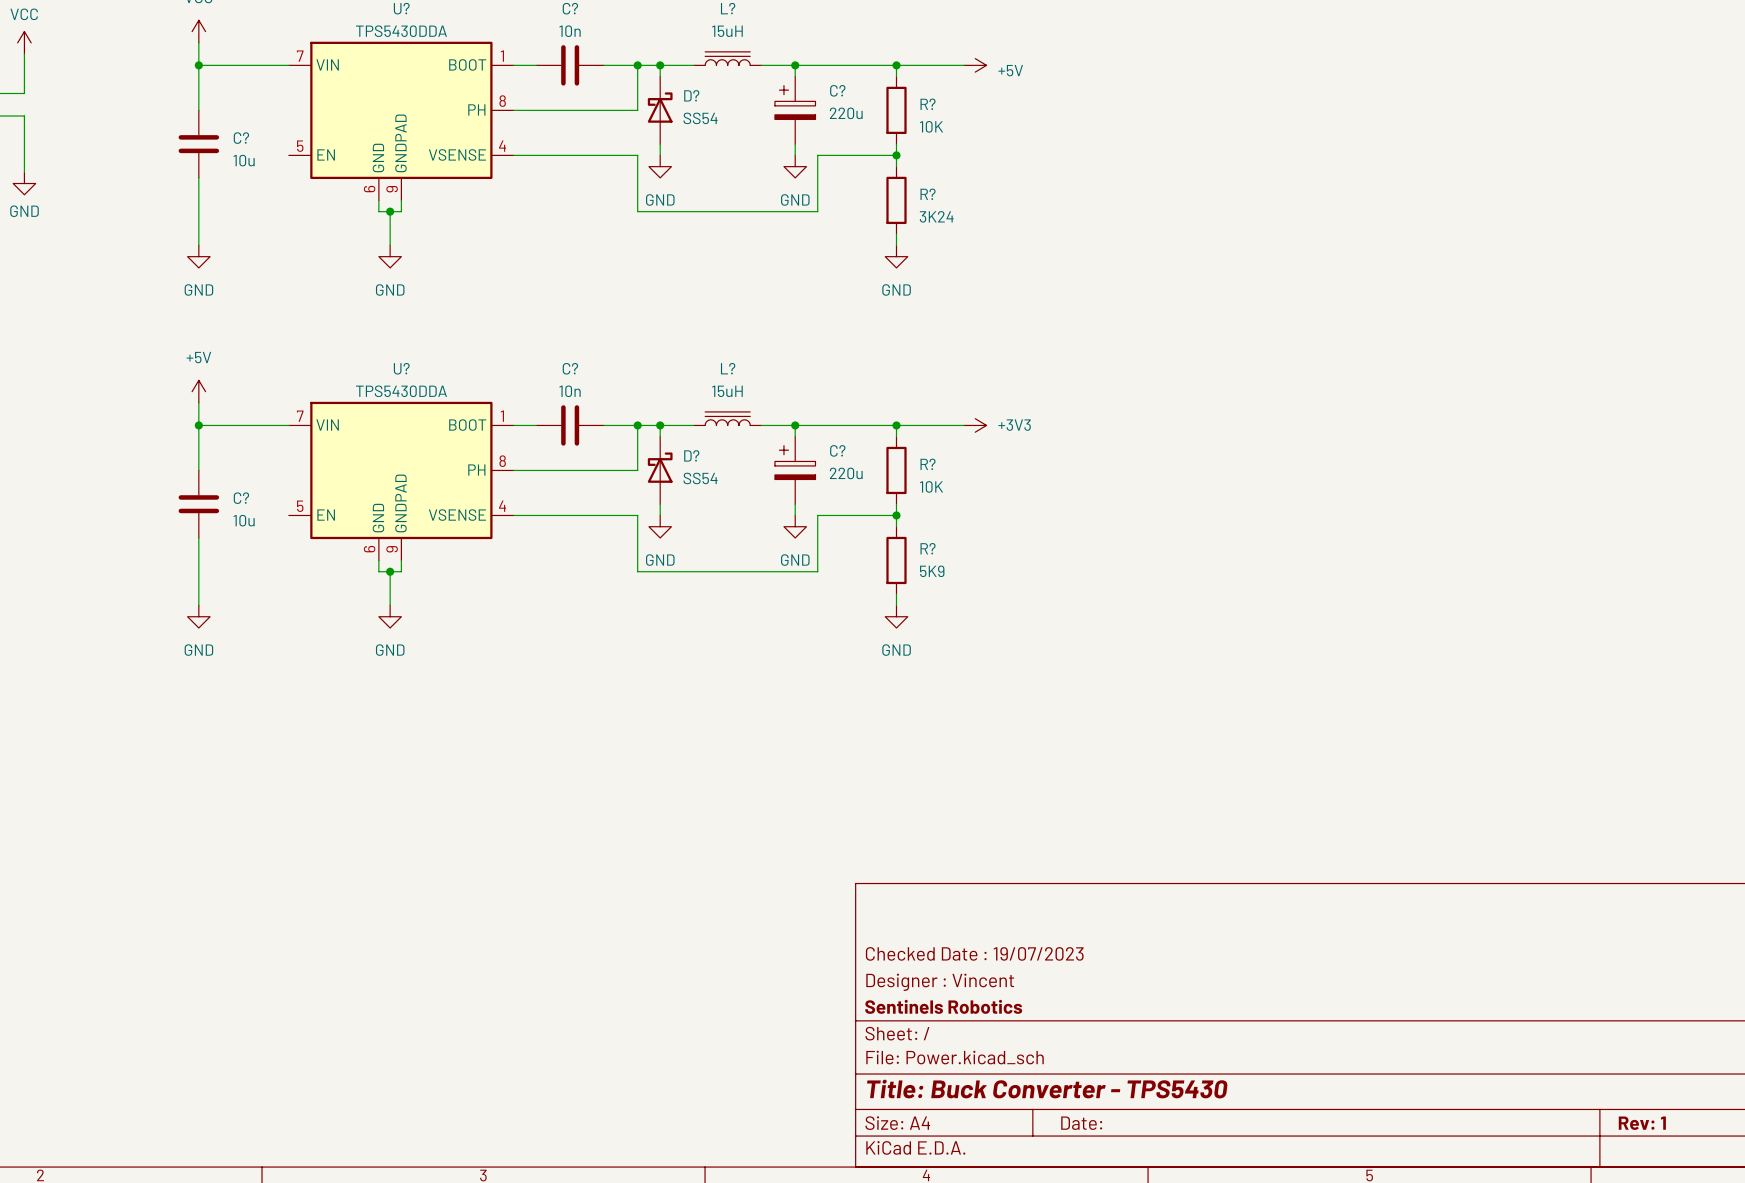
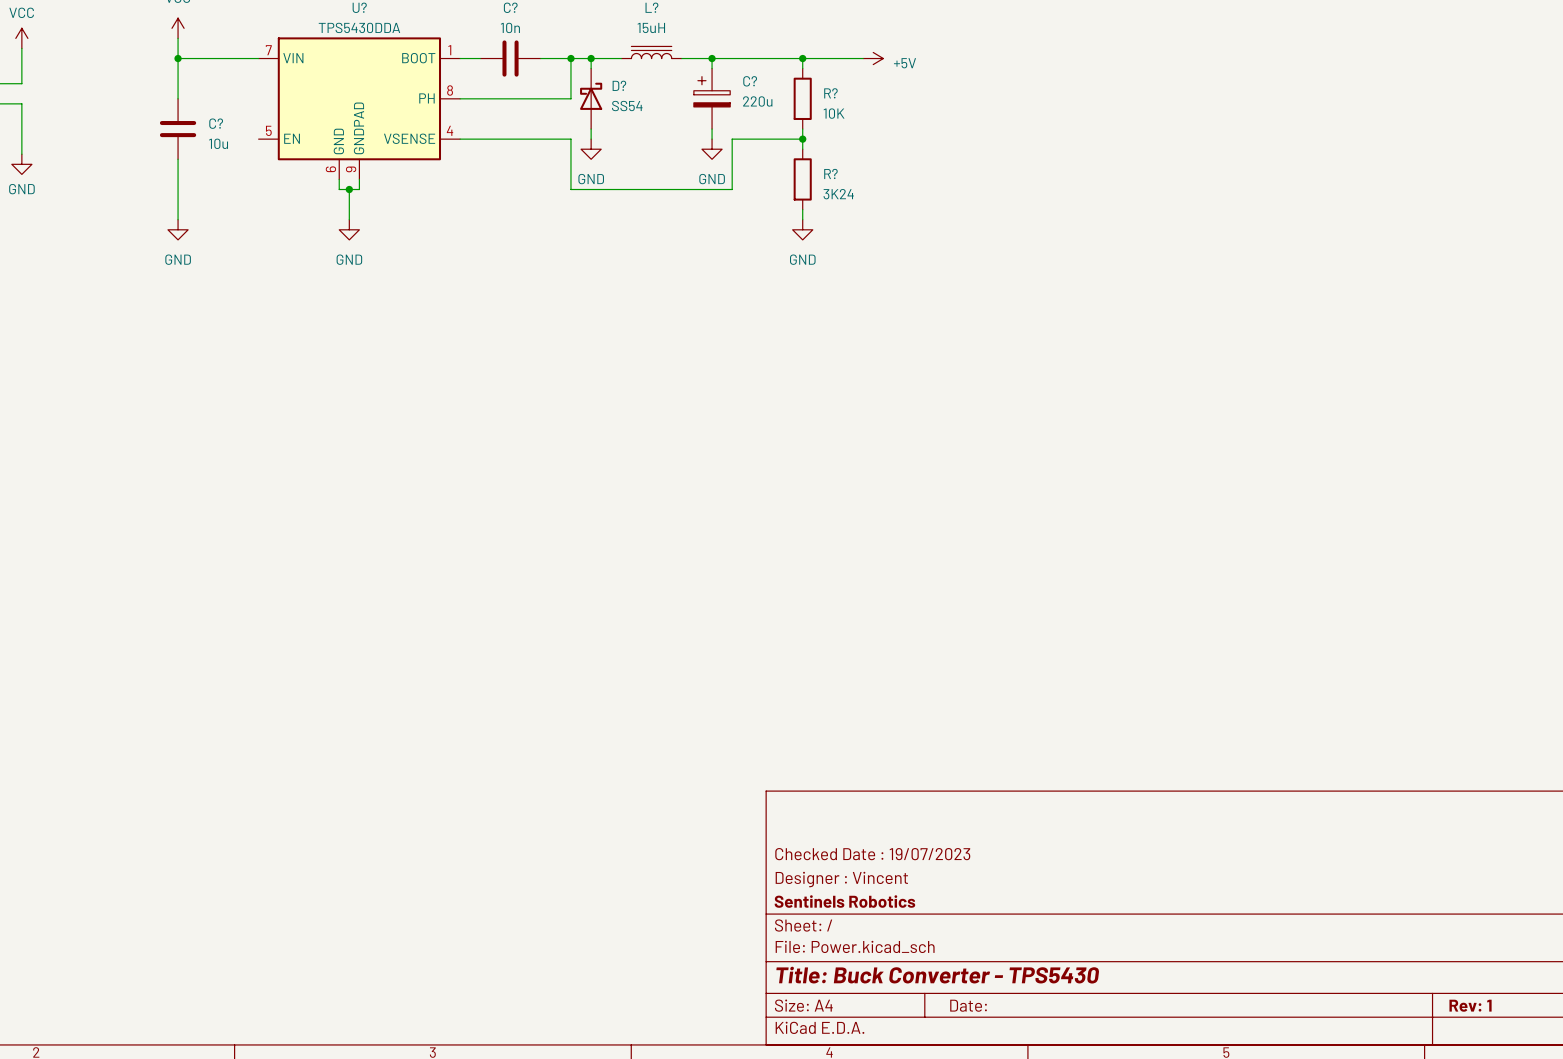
power symbol: +5V (198, 391) -> none
wire: (198, 402) (198, 470) -> none
L?: 15uH (727, 418) -> none
wire: (198, 425) (288, 425) -> none
junction: (198, 425) -> none
wire: (513, 425) (536, 425) -> none
C?: 10n (570, 425) -> none
wire: (603, 425) (693, 425) -> none
wire: (637, 425) (637, 470) (513, 470) -> none
junction: (637, 425) -> none
wire: (660, 425) (660, 436) -> none
junction: (660, 425) -> none
wire: (761, 425) (964, 425) -> none
wire: (795, 425) (795, 436) -> none
junction: (795, 425) -> none
wire: (896, 425) (896, 436) -> none
junction: (896, 425) -> none
power symbol: +3V3 (975, 425) -> none
D?: SS54 (660, 470) -> none
C?: 220u (795, 470) -> none
R?: 10K (896, 470) -> none
U?: TPS5430DDA (401, 481) -> none
C?: 10u (198, 504) -> none
wire: (660, 504) (660, 515) -> none
wire: (795, 504) (795, 515) -> none
wire: (896, 504) (896, 526) -> none
wire: (513, 515) (637, 515) (637, 571) (817, 571) (817, 515) (896, 515) -> none
junction: (896, 515) -> none
power symbol: GND (660, 526) -> none
power symbol: GND (795, 526) -> none
wire: (198, 537) (198, 605) -> none
wire: (378, 560) (378, 571) (401, 571) (401, 560) -> none
R?: 5K9 (896, 560) -> none
wire: (390, 571) (390, 605) -> none
junction: (390, 571) -> none
wire: (896, 594) (896, 605) -> none
power symbol: GND (198, 616) -> none
power symbol: GND (390, 616) -> none
power symbol: GND (896, 616) -> none

